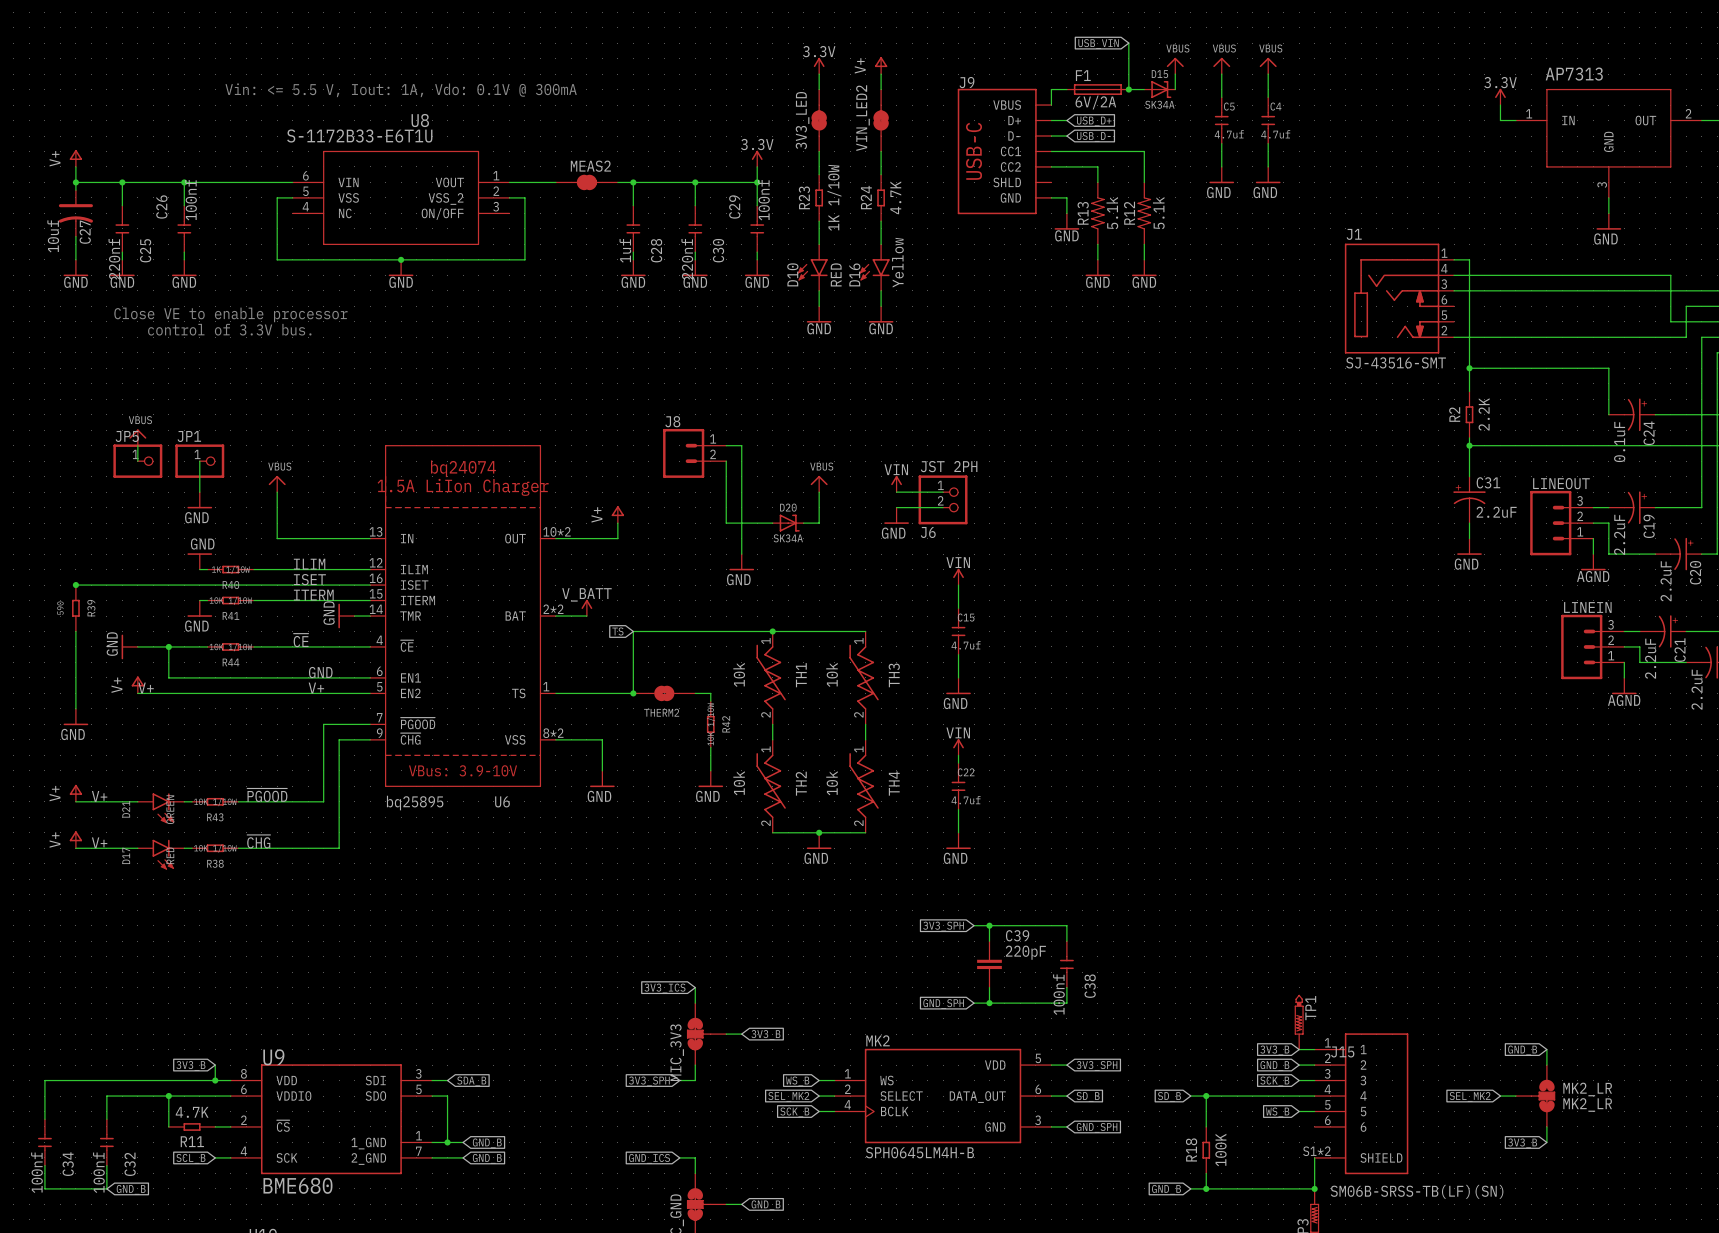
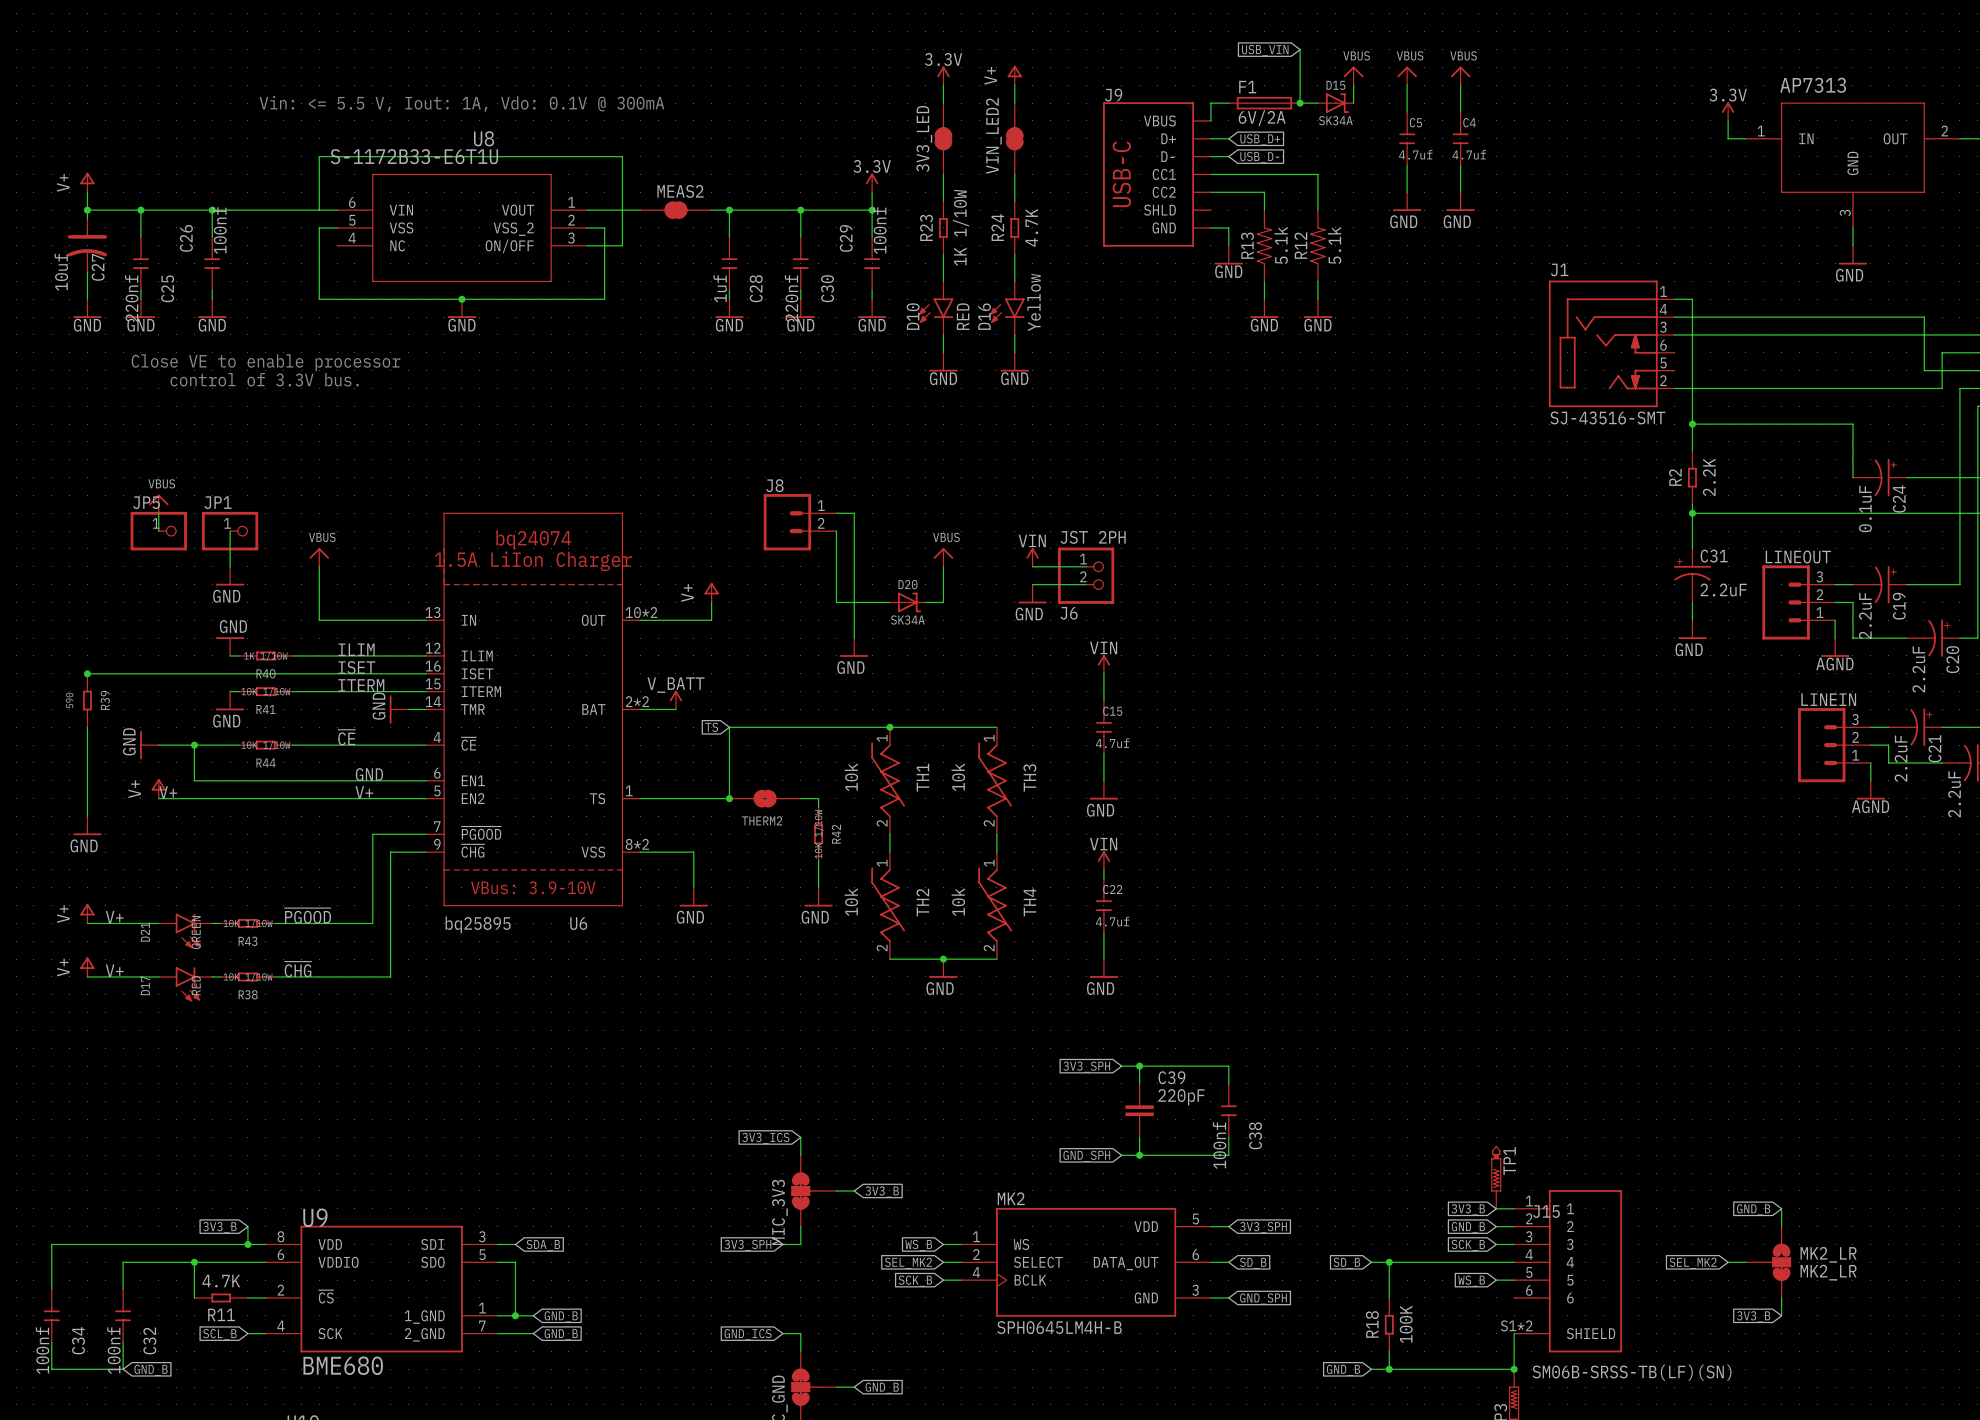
wire: none -> (319, 210) (319, 156) (622, 156) (622, 245) (586, 245)

